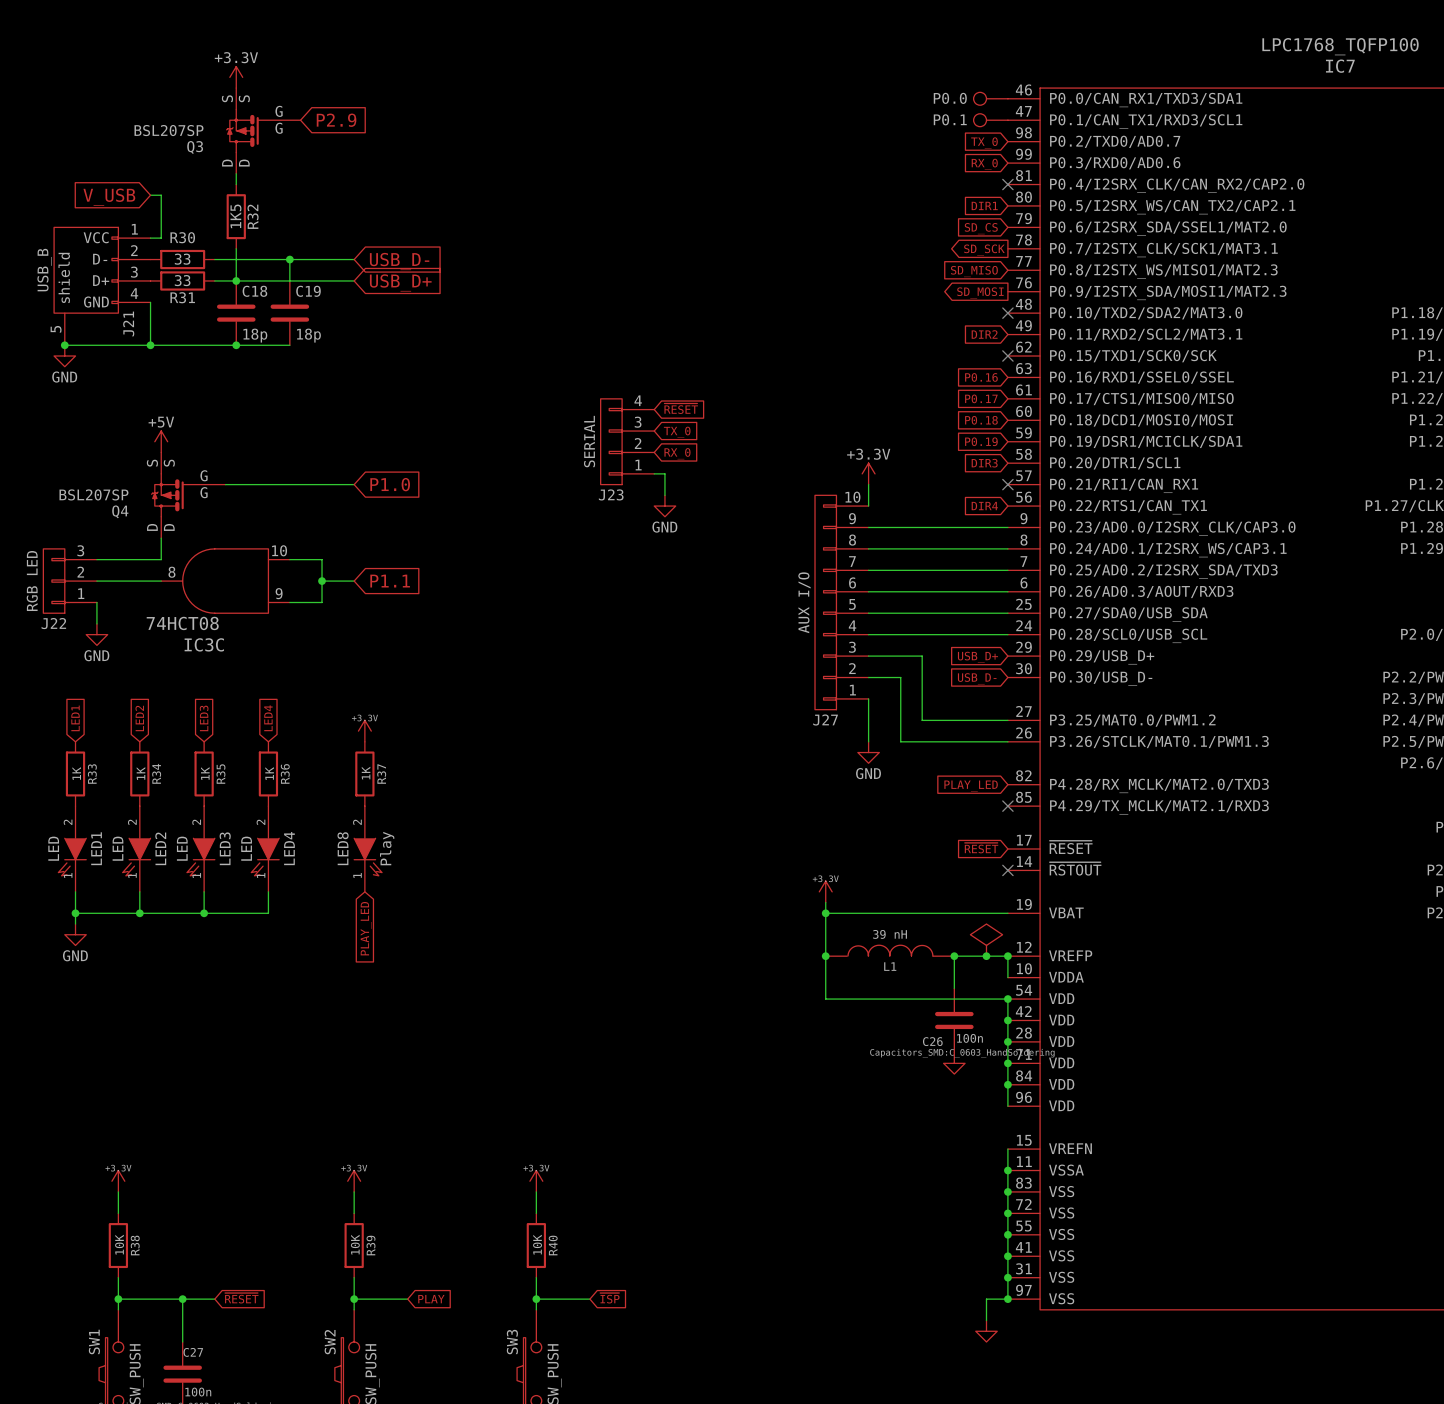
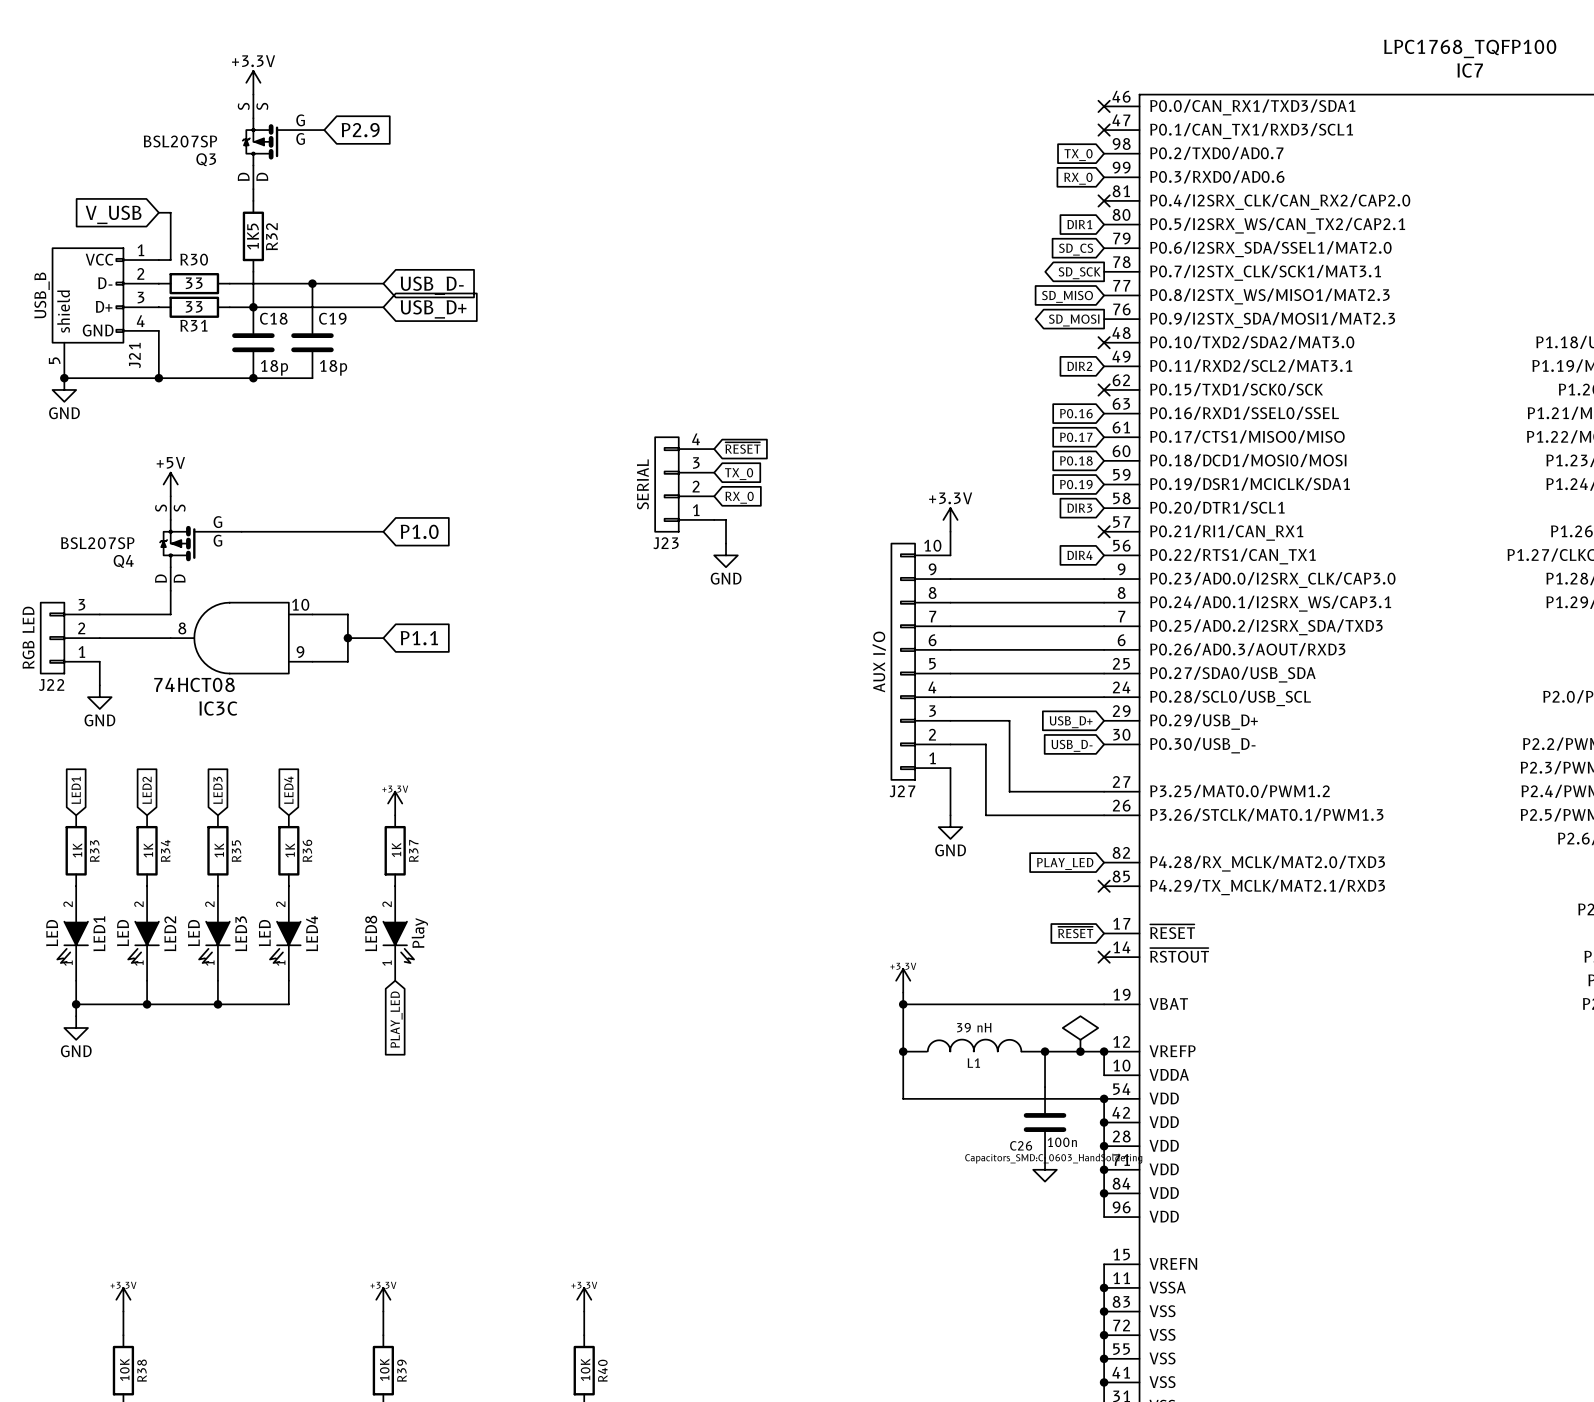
P0.0: (990, 98) -> none
no-connect mark: none -> (1104, 106)
P0.1: (990, 120) -> none
no-connect mark: none -> (1104, 130)

